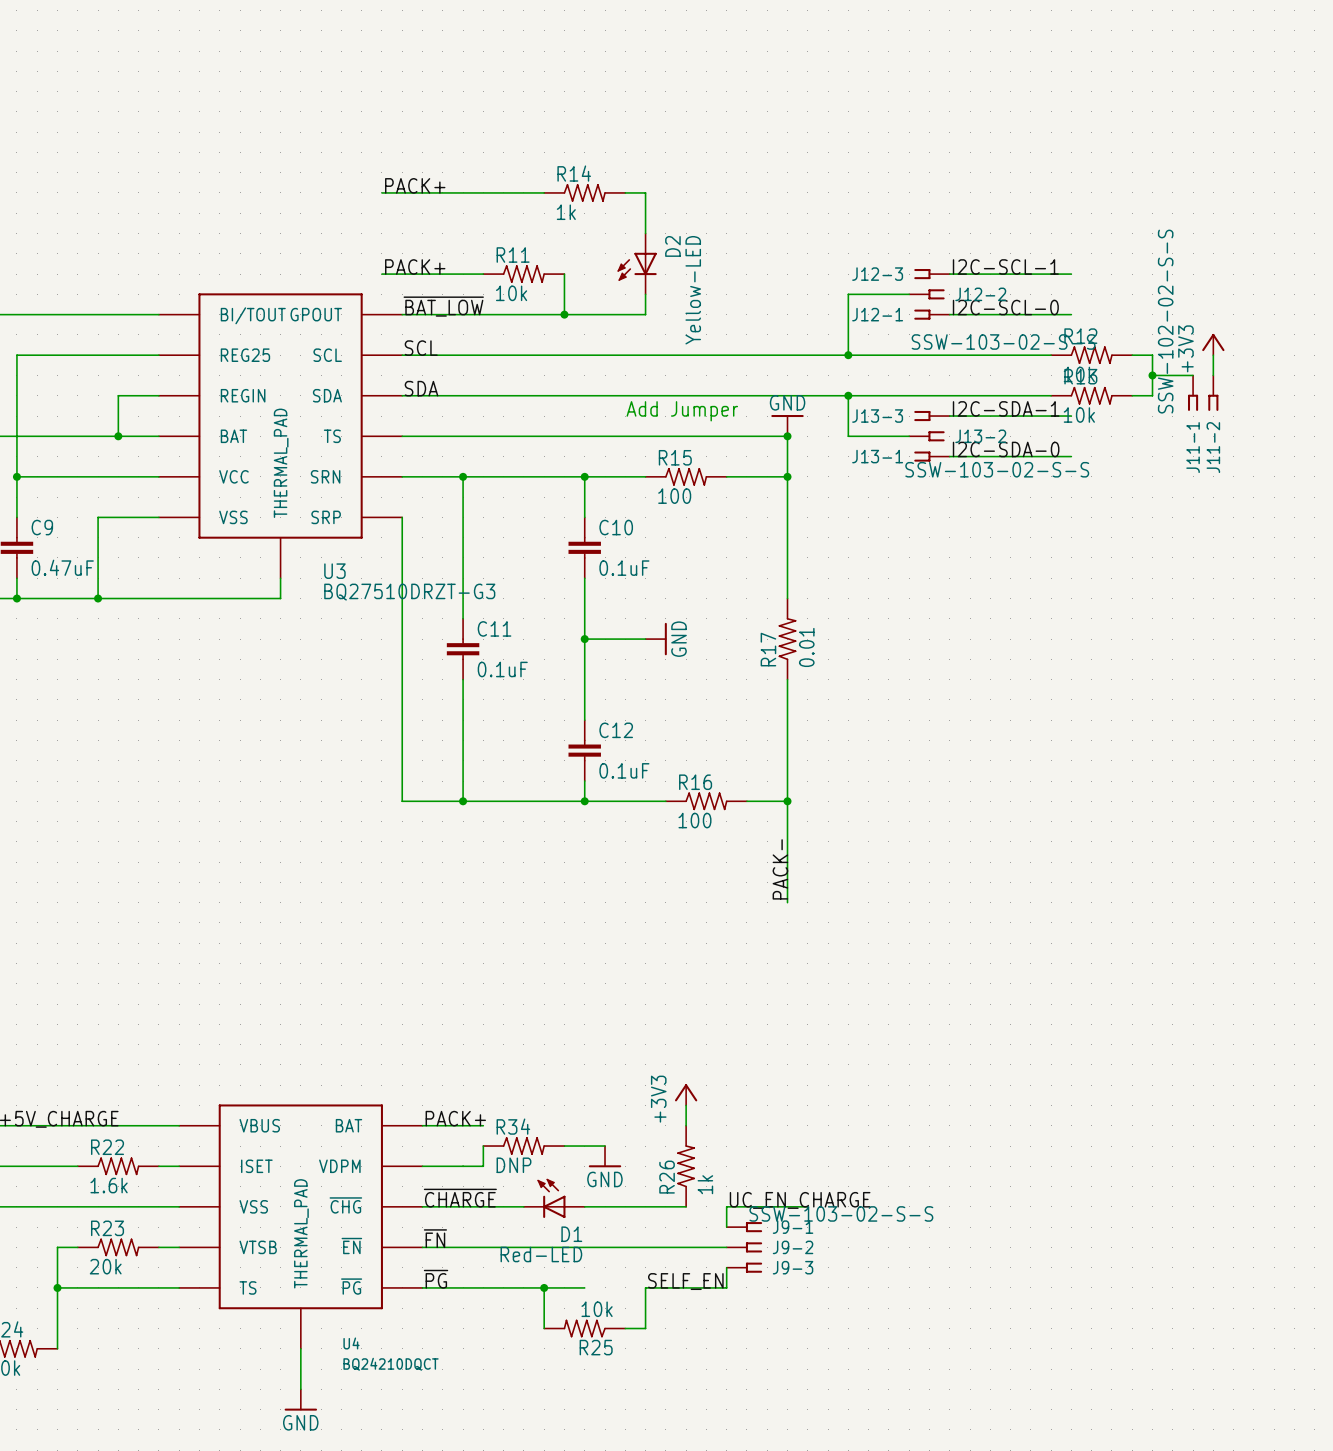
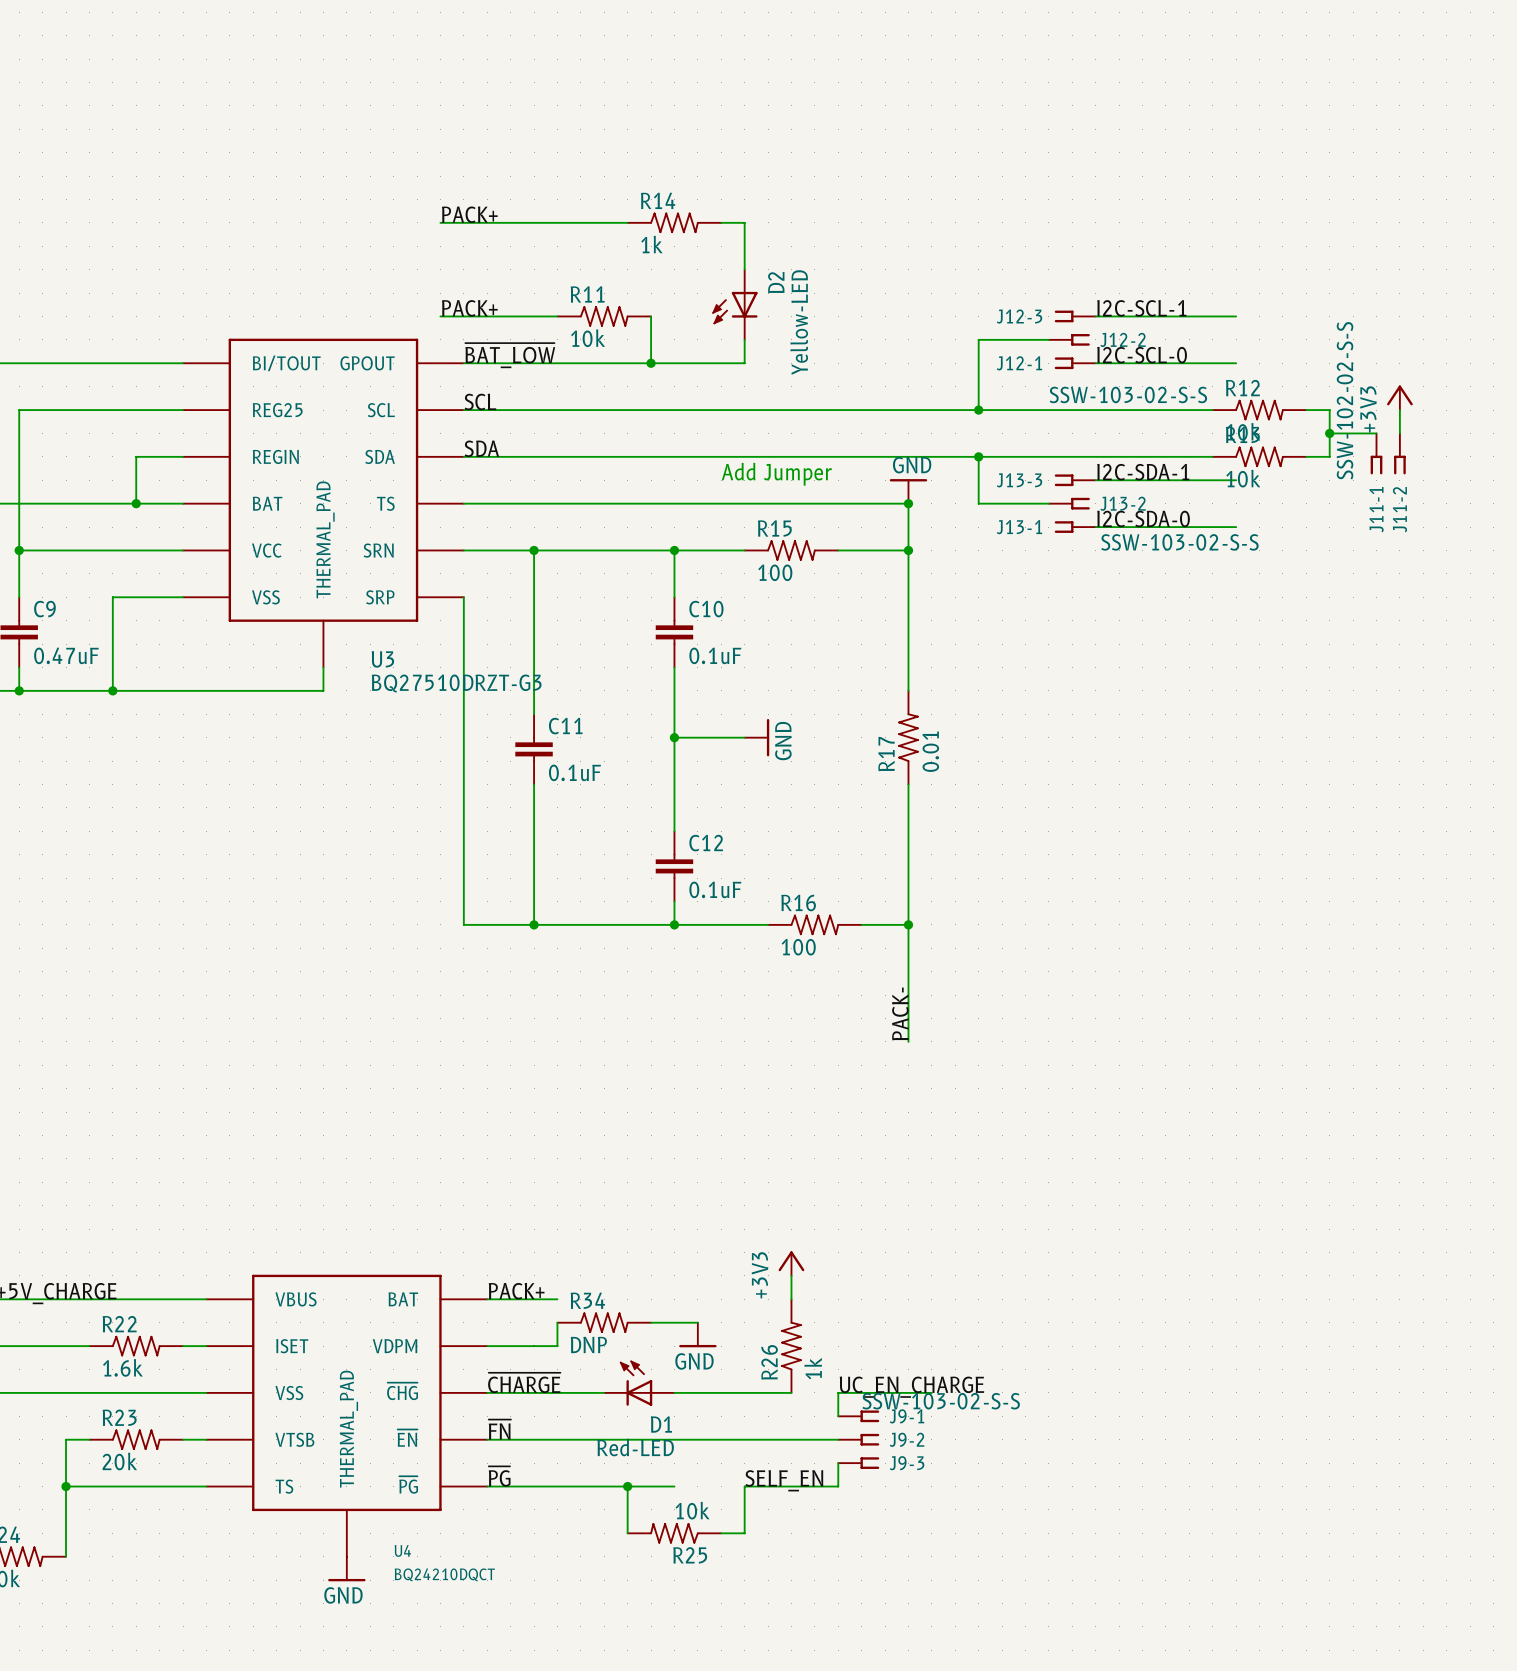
power symbol position: GND (300, 1399) -> GND (346, 1569)

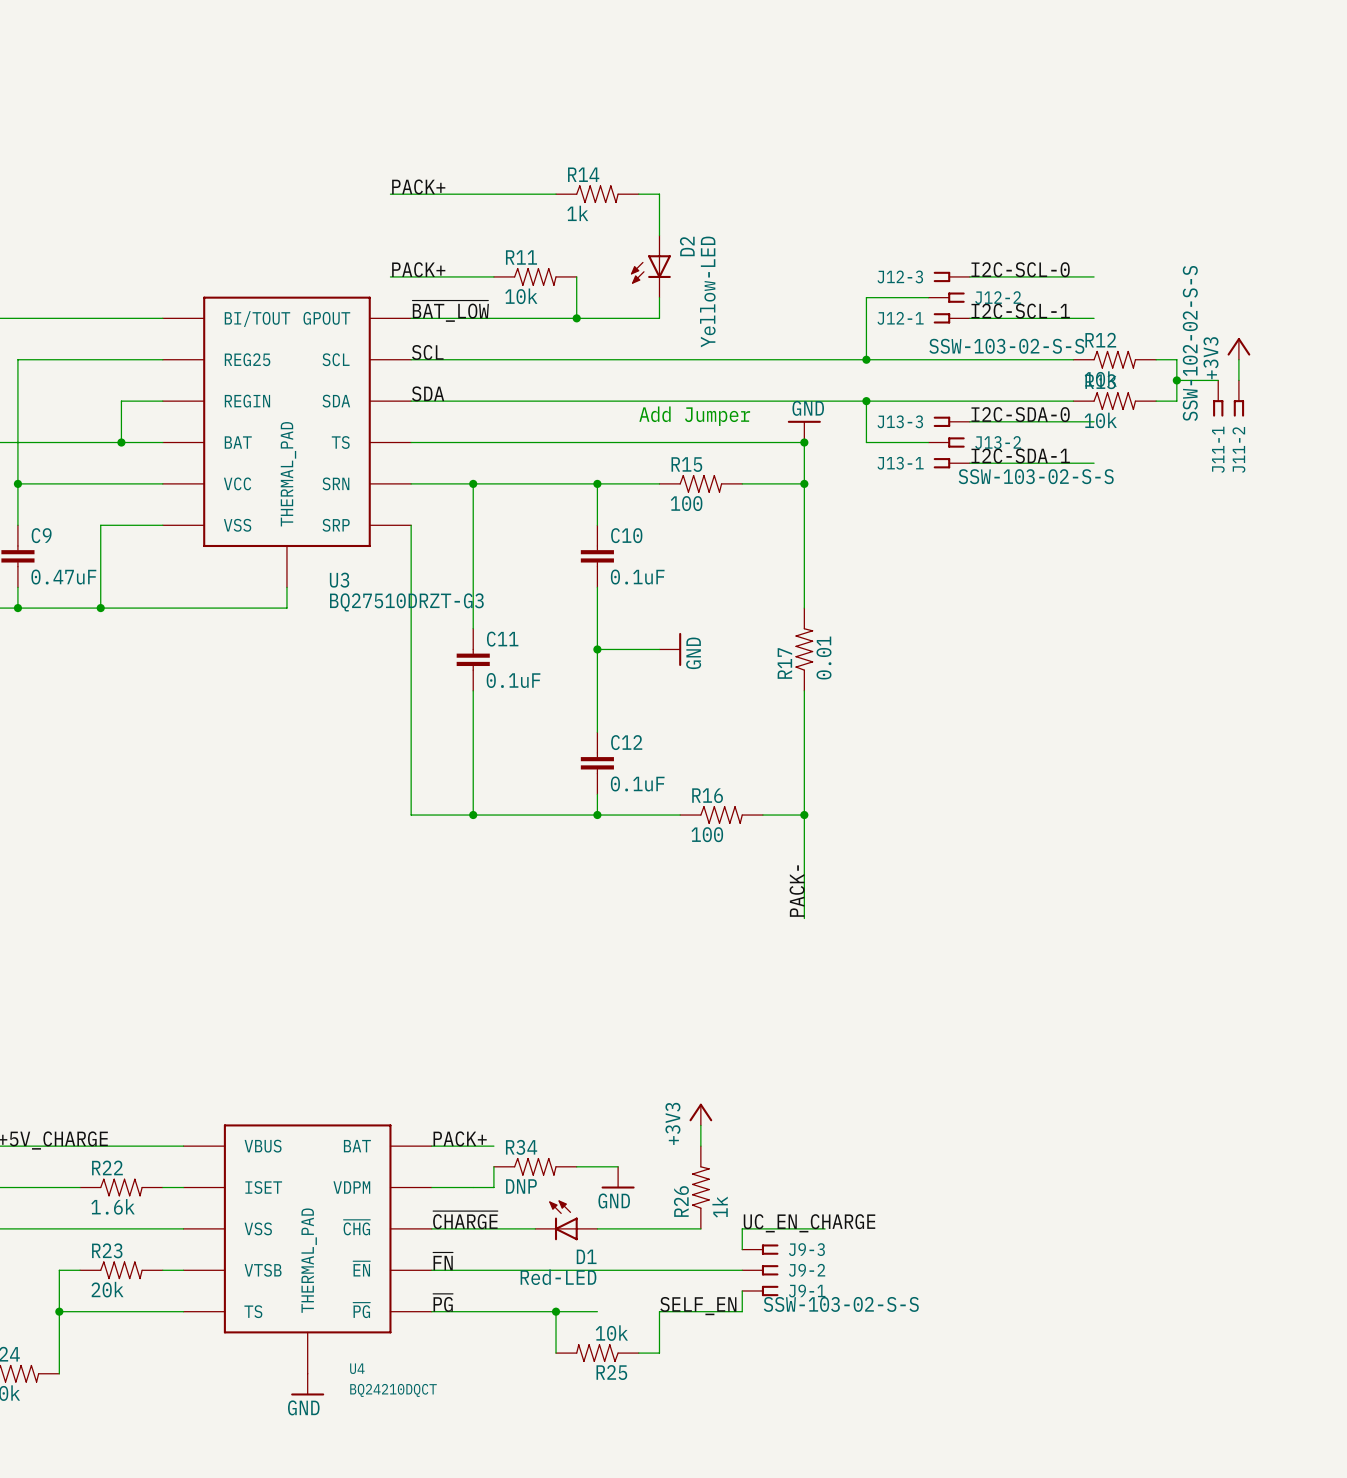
label: I2C-SCL-1 (1141, 308) -> I2C-SCL-0 (1020, 269)
label: I2C-SCL-0 (1142, 355) -> I2C-SCL-1 (1020, 311)
label: I2C-SDA-1 (1143, 472) -> I2C-SDA-0 (1020, 414)
label: I2C-SDA-0 (1143, 518) -> I2C-SDA-1 (1020, 455)
J9-1 value: SSW-103-02-S-S (941, 1401) -> none
J9-1 name: J9-1 (907, 1416) -> J9-3 (806, 1249)
J9-3 name: J9-3 (907, 1463) -> J9-1 (807, 1290)
J9-3 value: none -> SSW-103-02-S-S (841, 1304)

